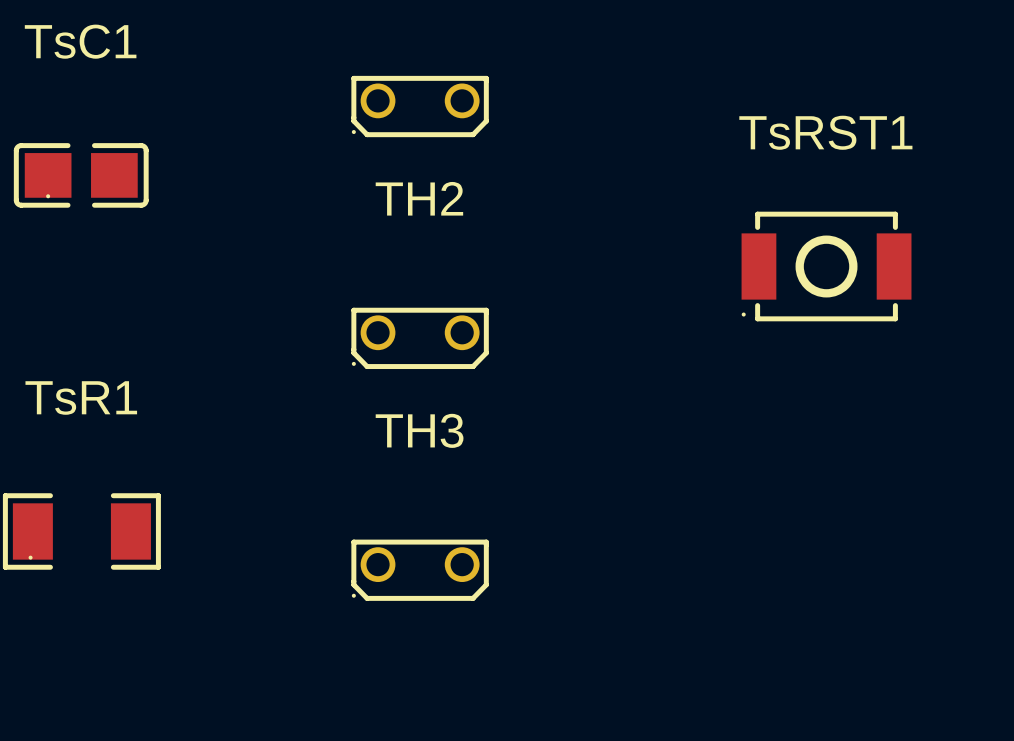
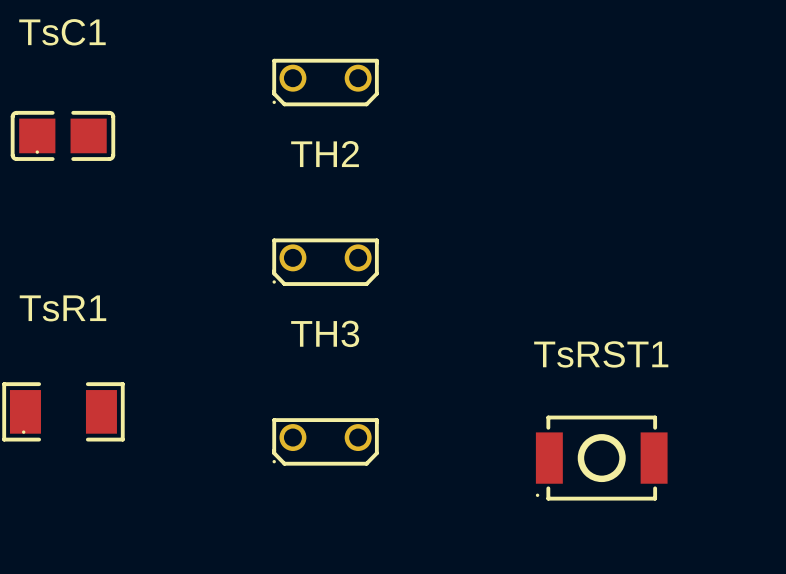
TsRST1 position: (826, 266) -> (601, 458)

